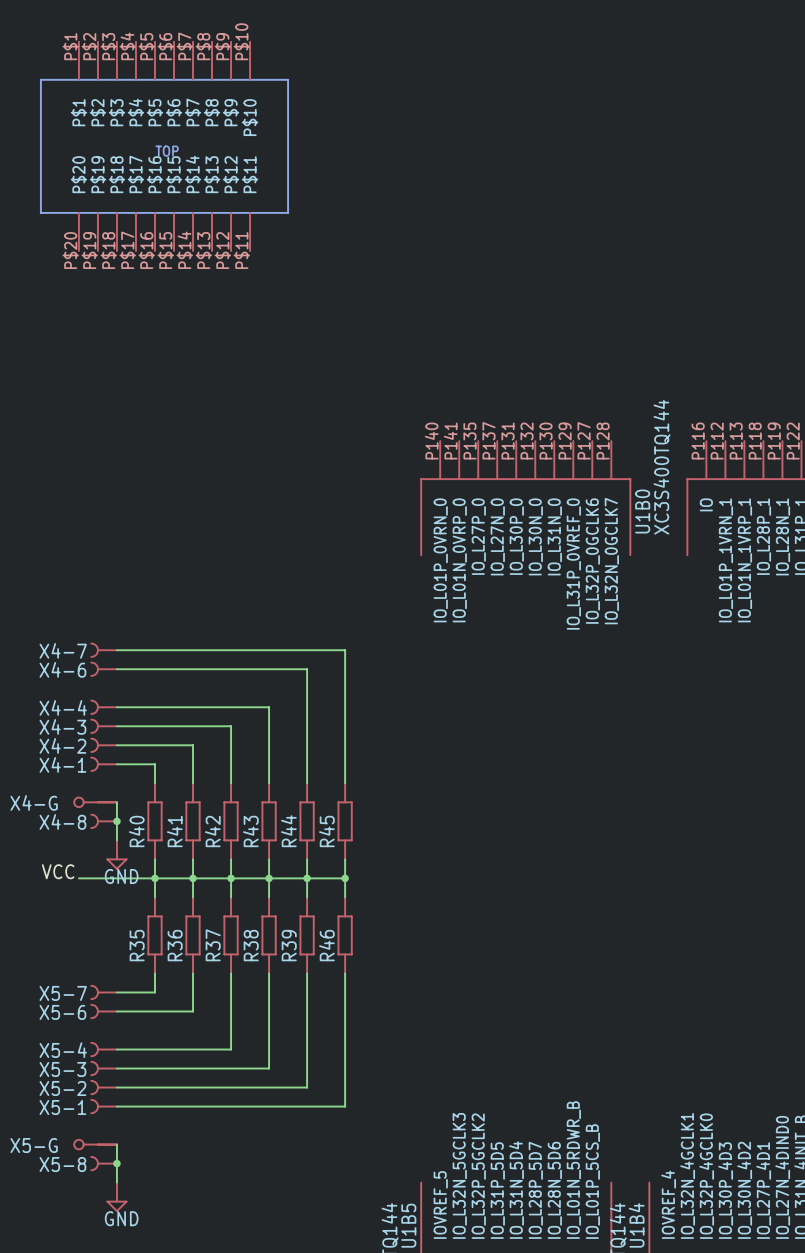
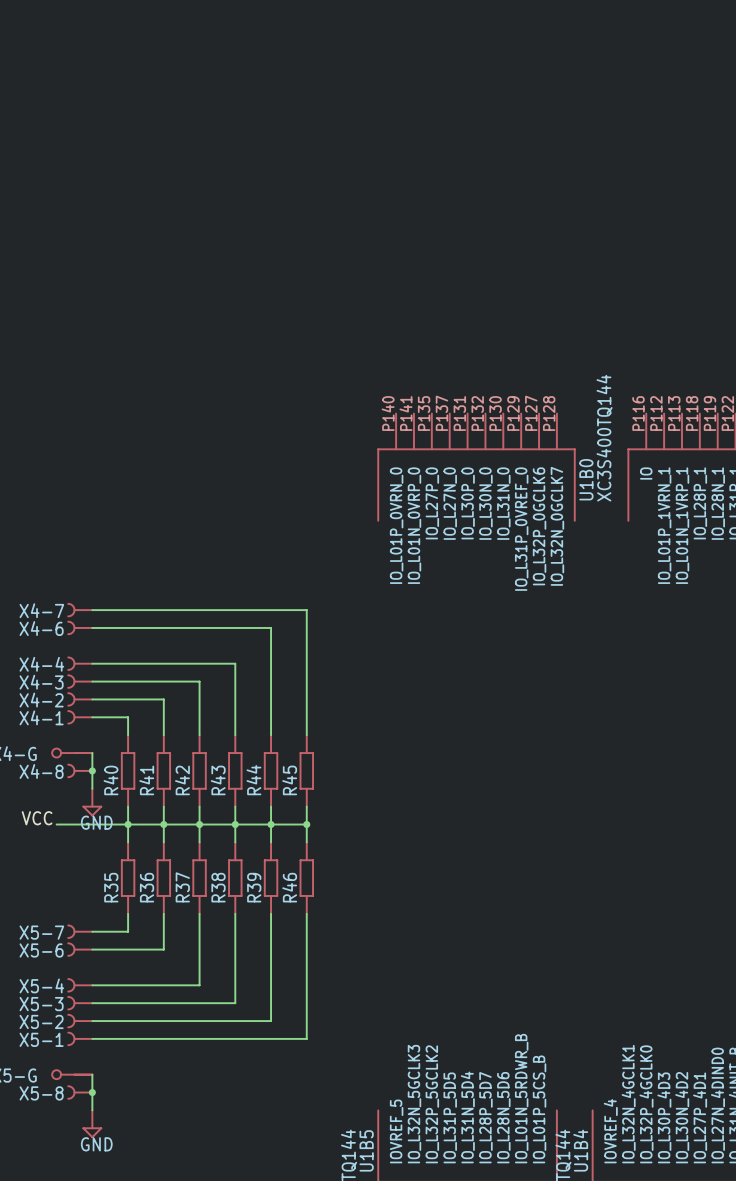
part: (164, 146) -> none

